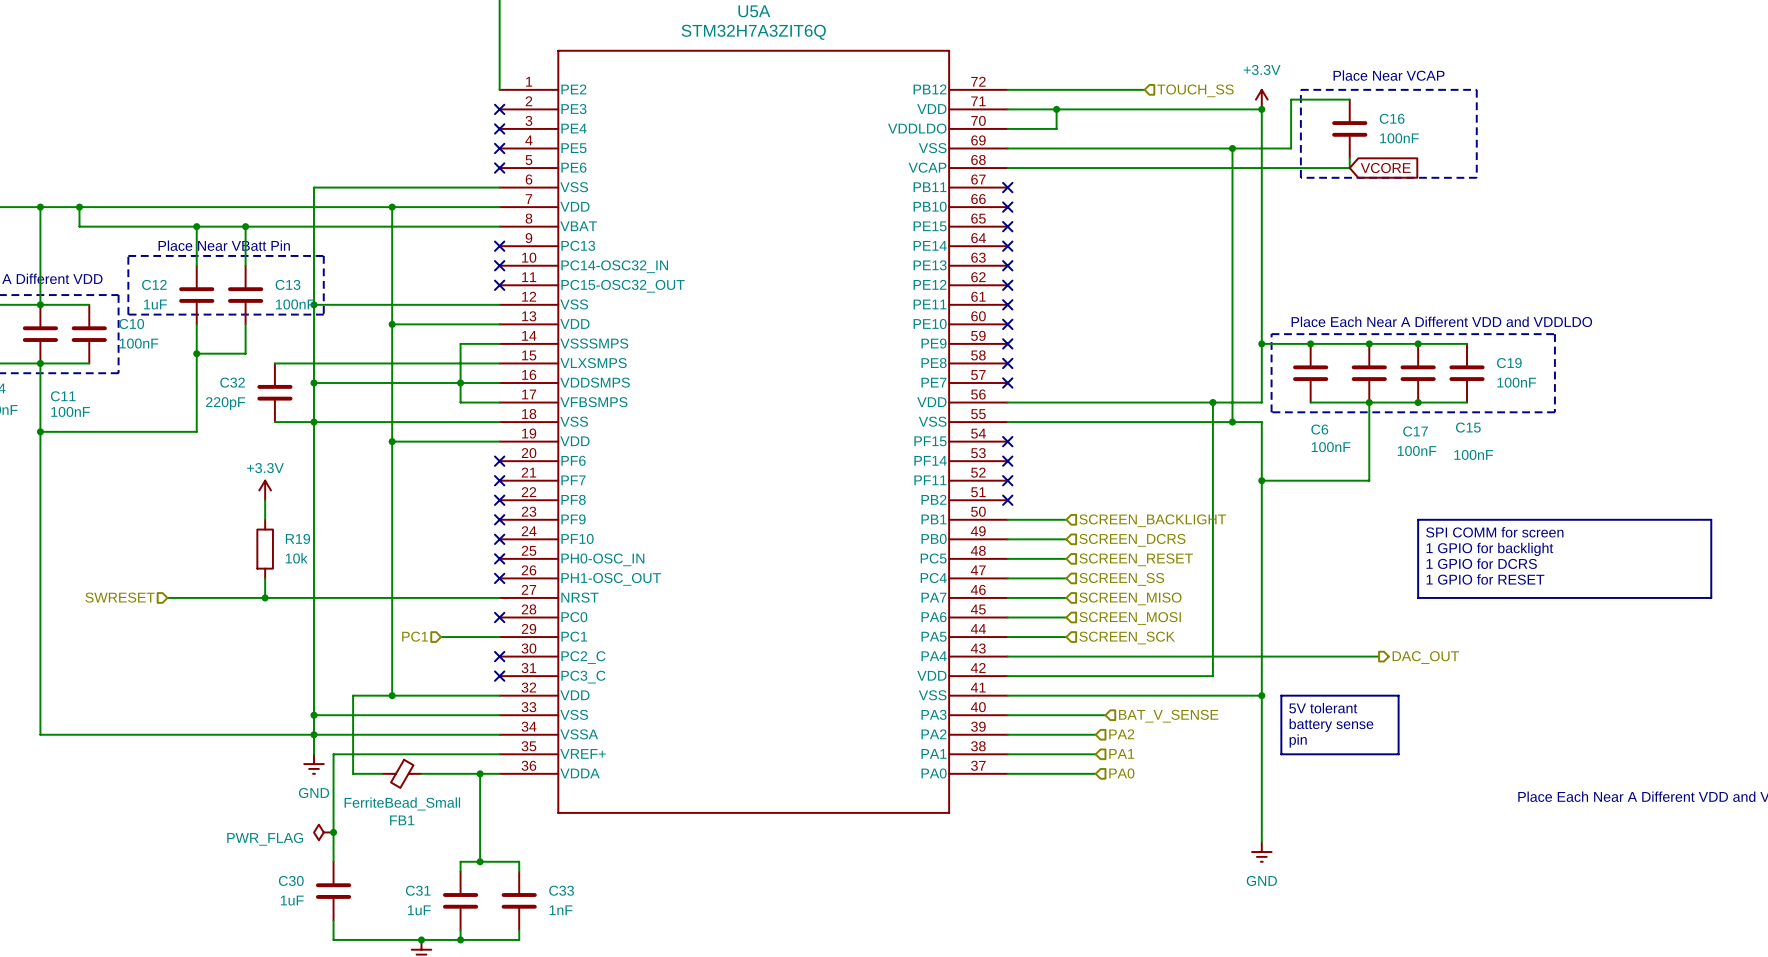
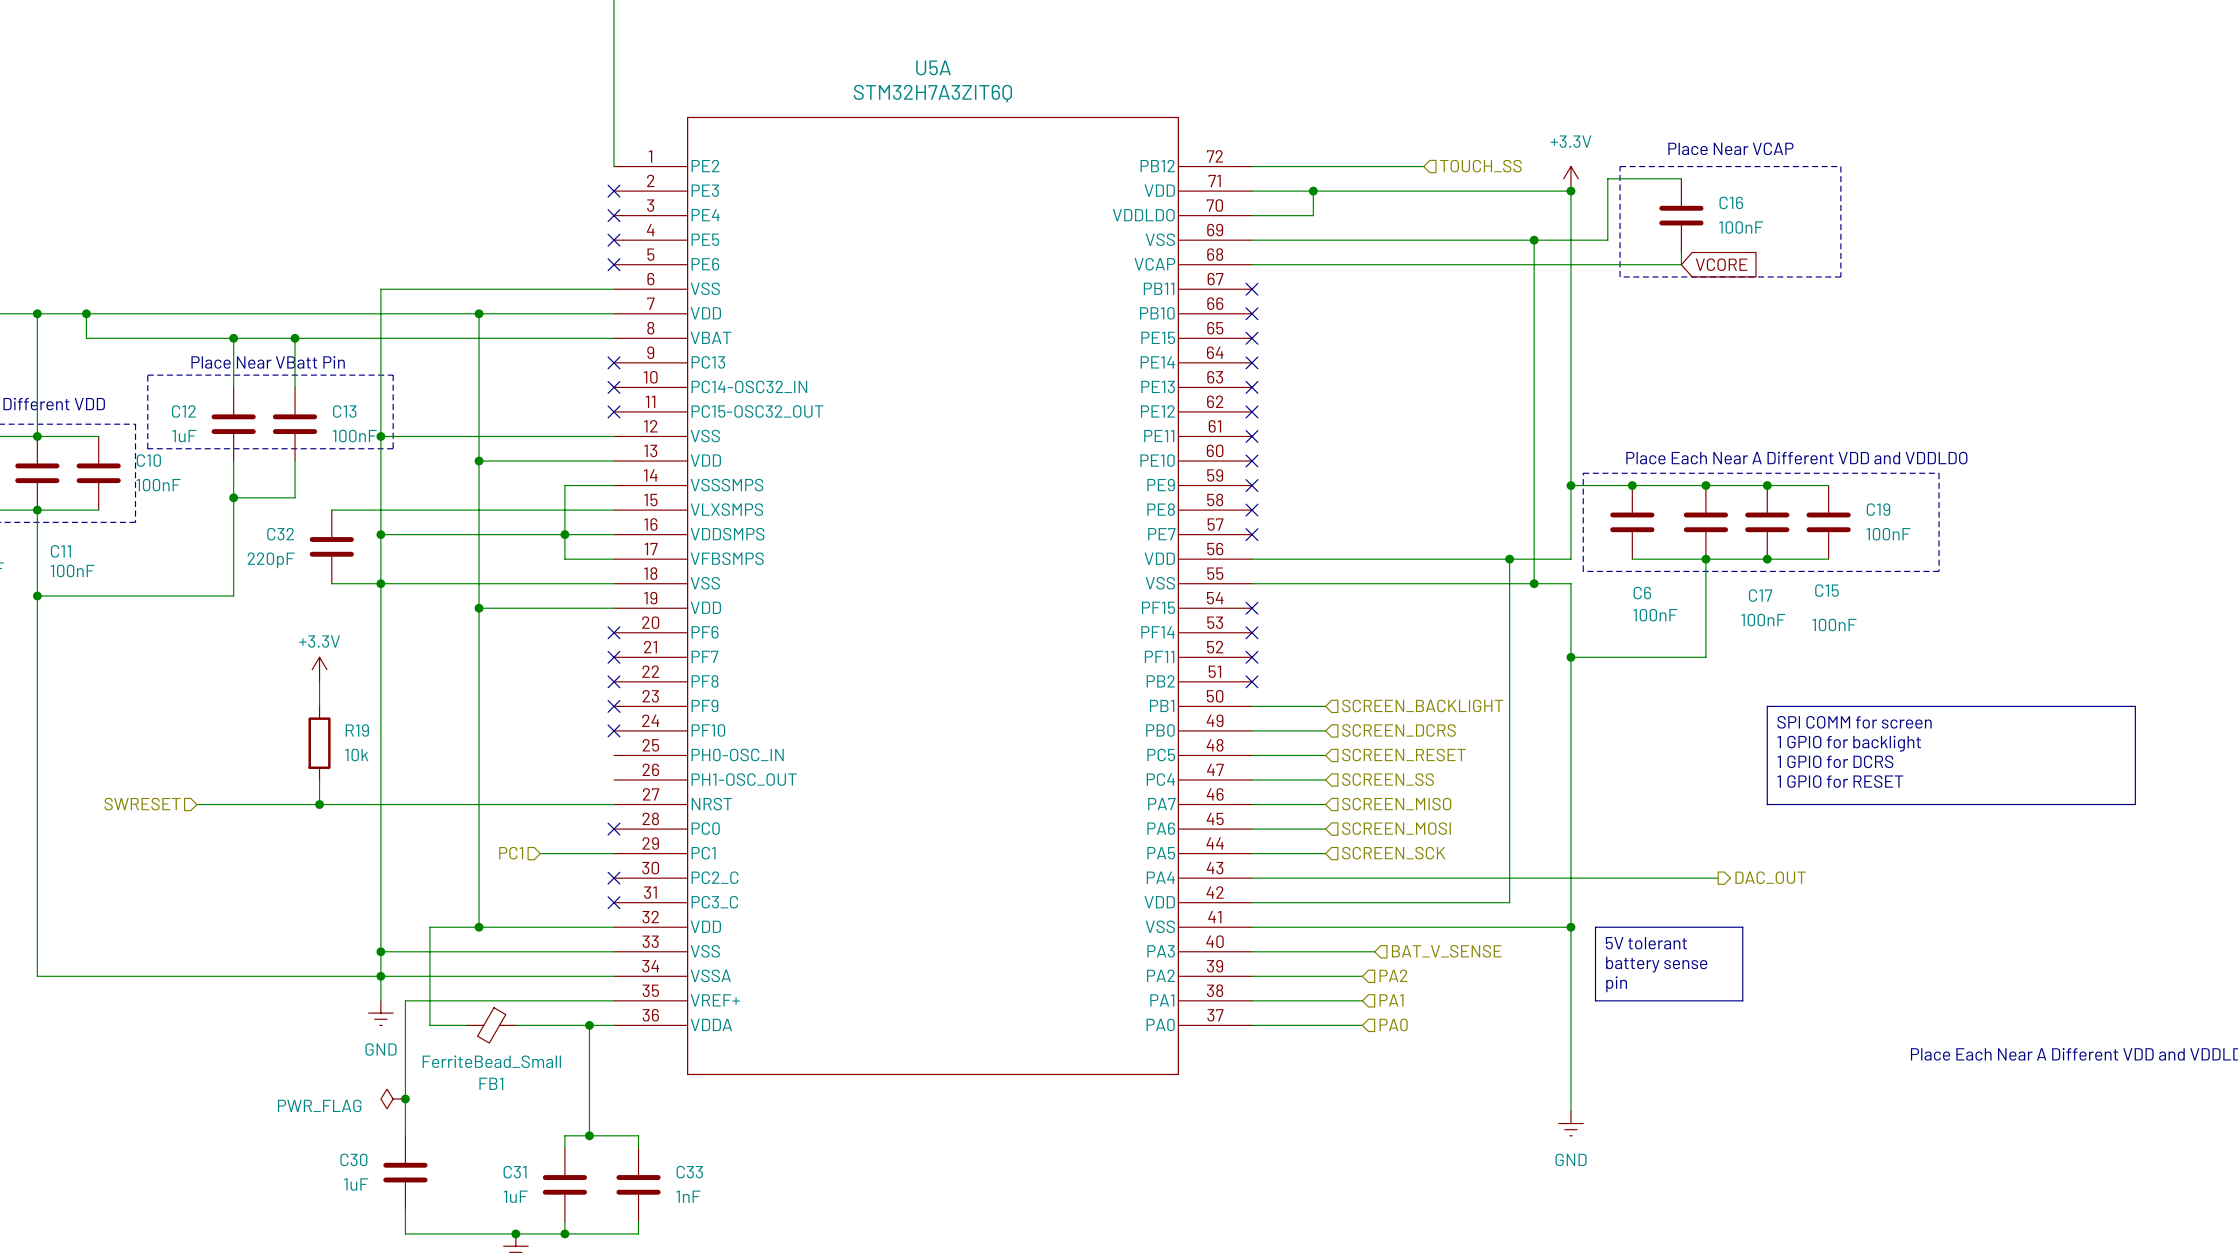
no-connect mark: (499, 558) -> none
no-connect mark: (499, 578) -> none

